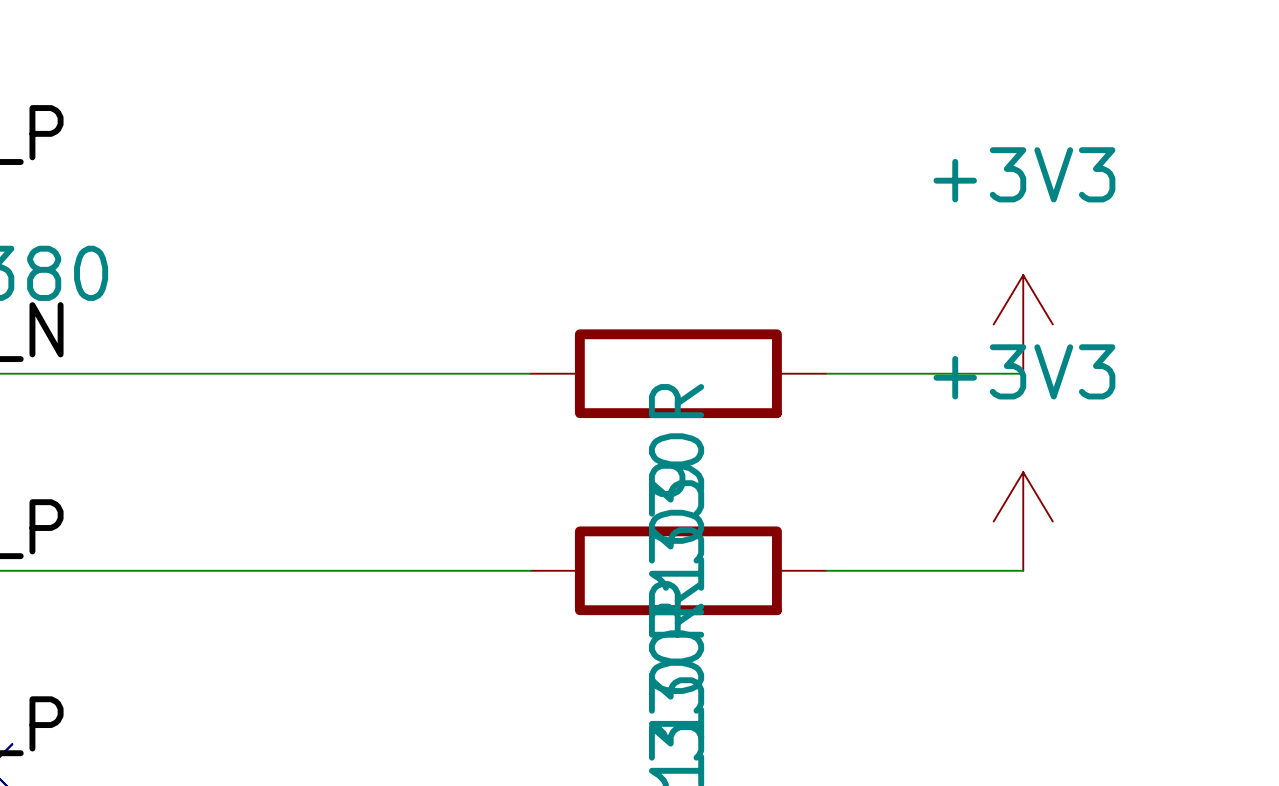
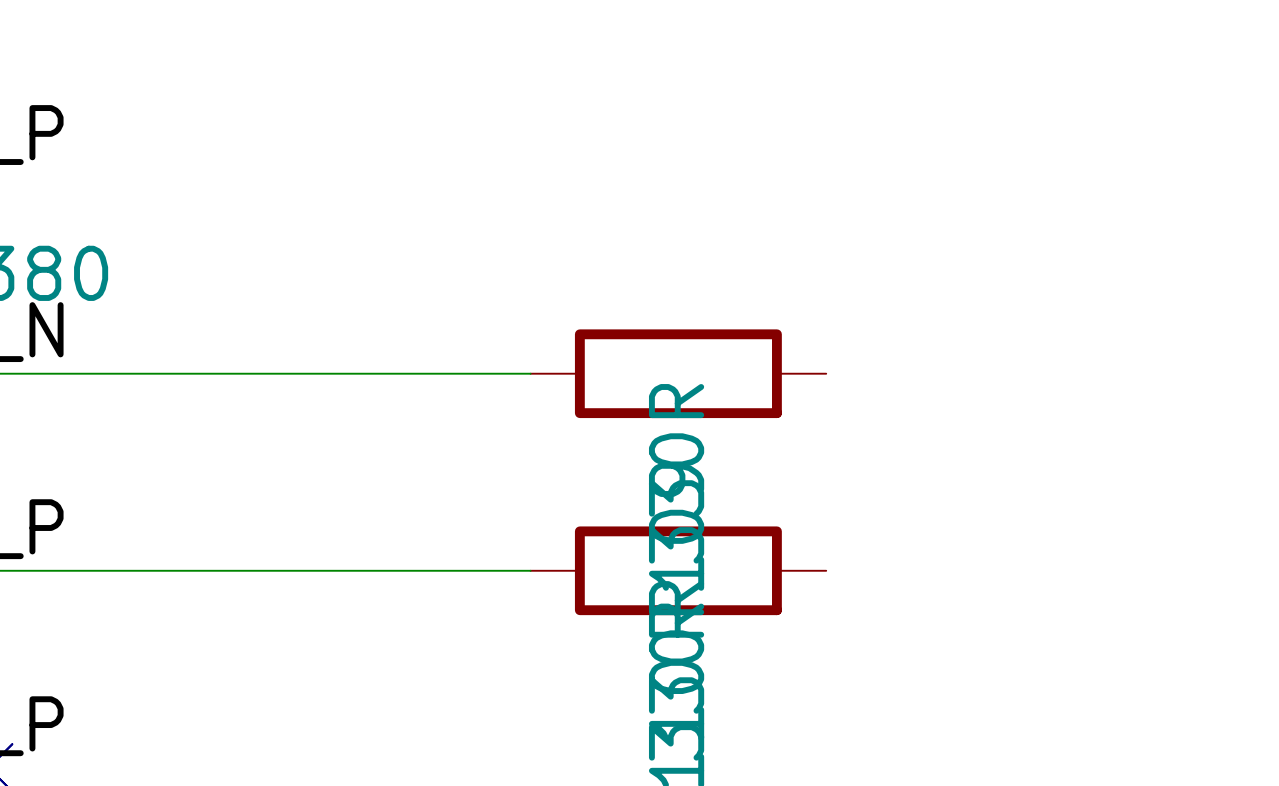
power symbol: +3V3 (1023, 324) -> none
wire: (826, 373) (1023, 373) -> none
power symbol: +3V3 (1023, 521) -> none
wire: (826, 570) (1023, 570) -> none

